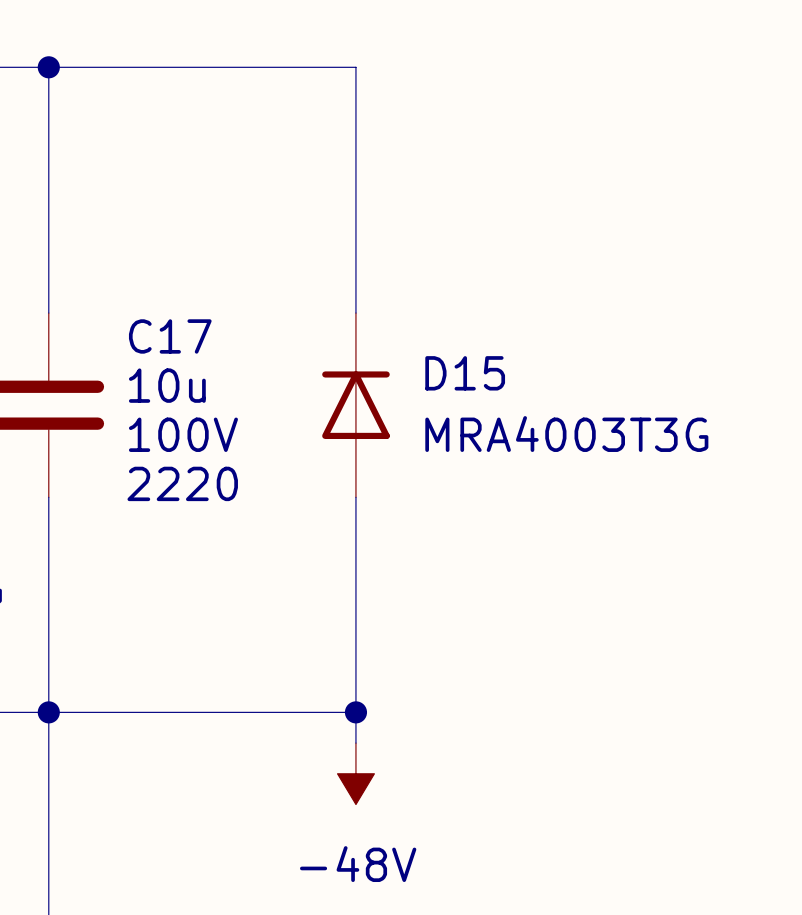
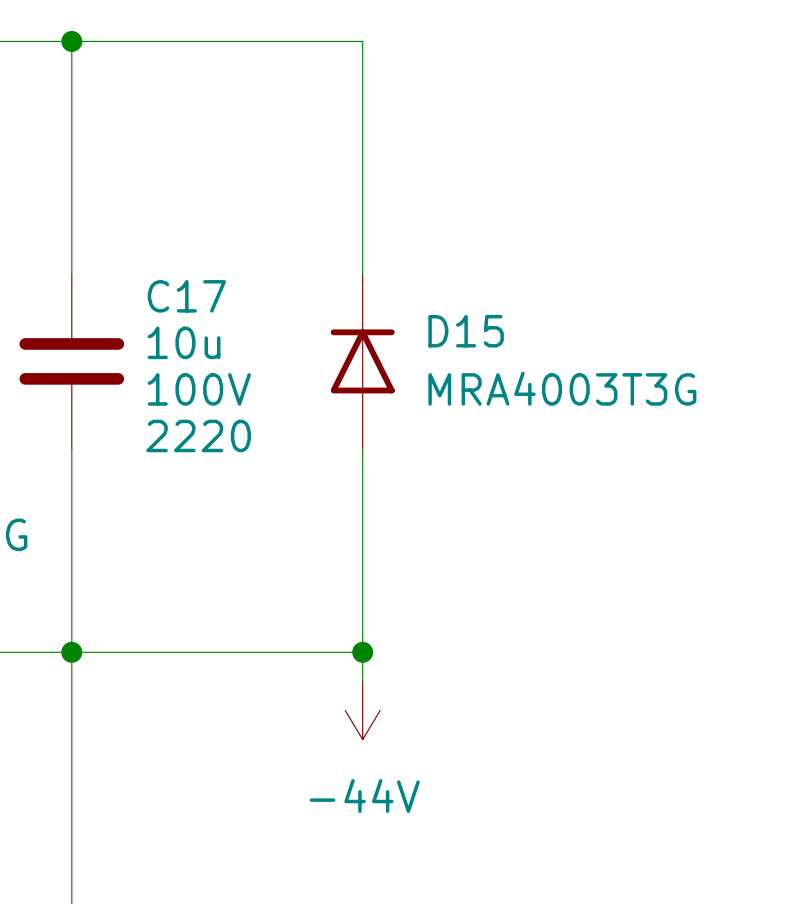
power symbol: -48V (355, 773) -> -44V (362, 710)

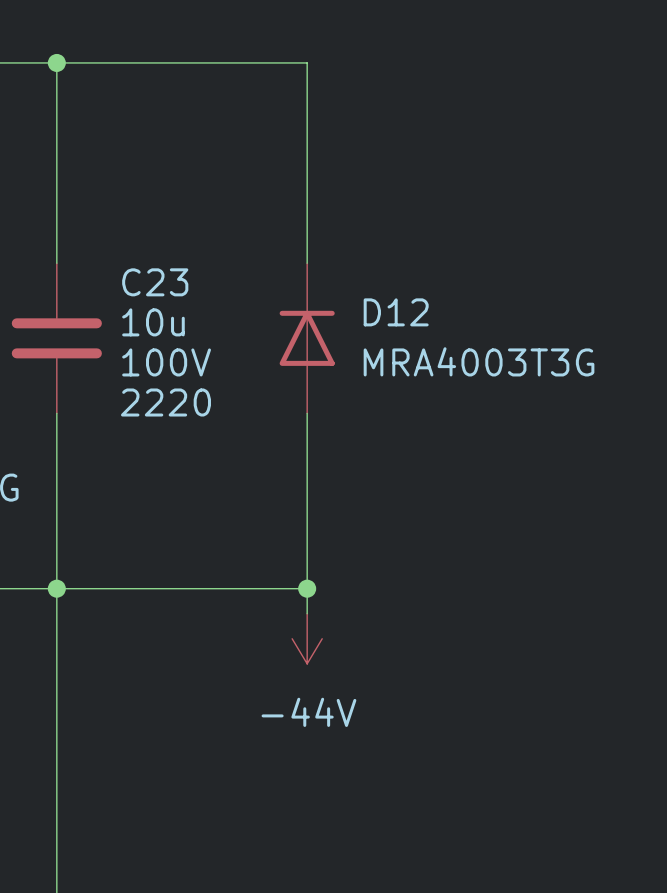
C17 name: C17 (186, 296) -> C23 (155, 282)
D15 name: D15 (466, 331) -> D12 (396, 312)

